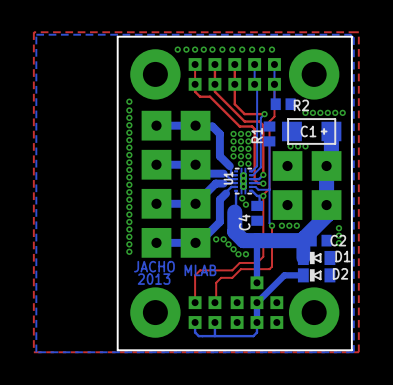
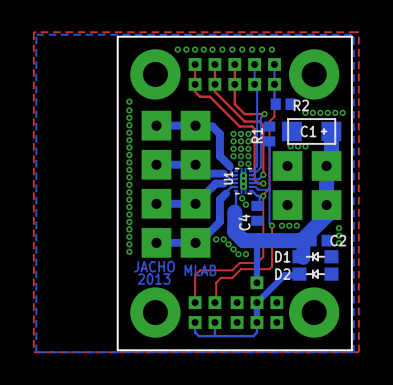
D1 footprint: [297, 250, 336, 266] -> [292, 250, 339, 264]
D1 name position: D1 (342, 256) -> D1 (282, 256)
D2 footprint: [297, 268, 336, 283] -> [292, 267, 339, 281]
D2 name position: D2 (340, 273) -> D2 (282, 274)

